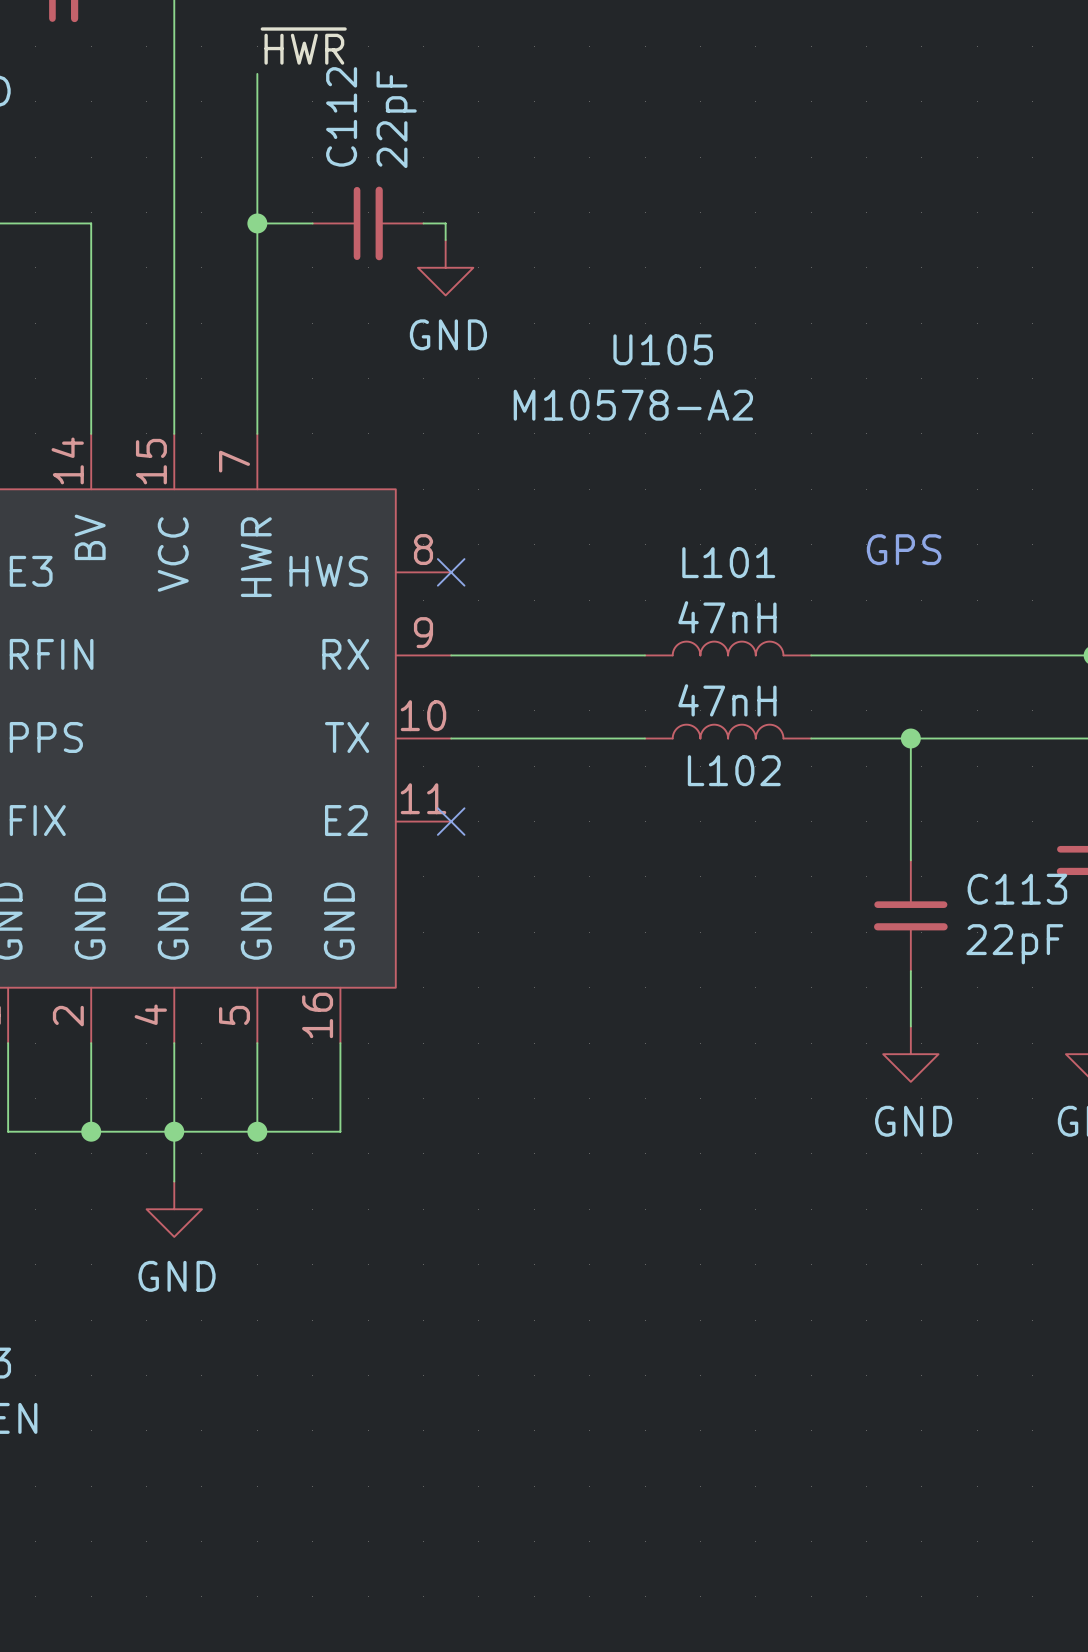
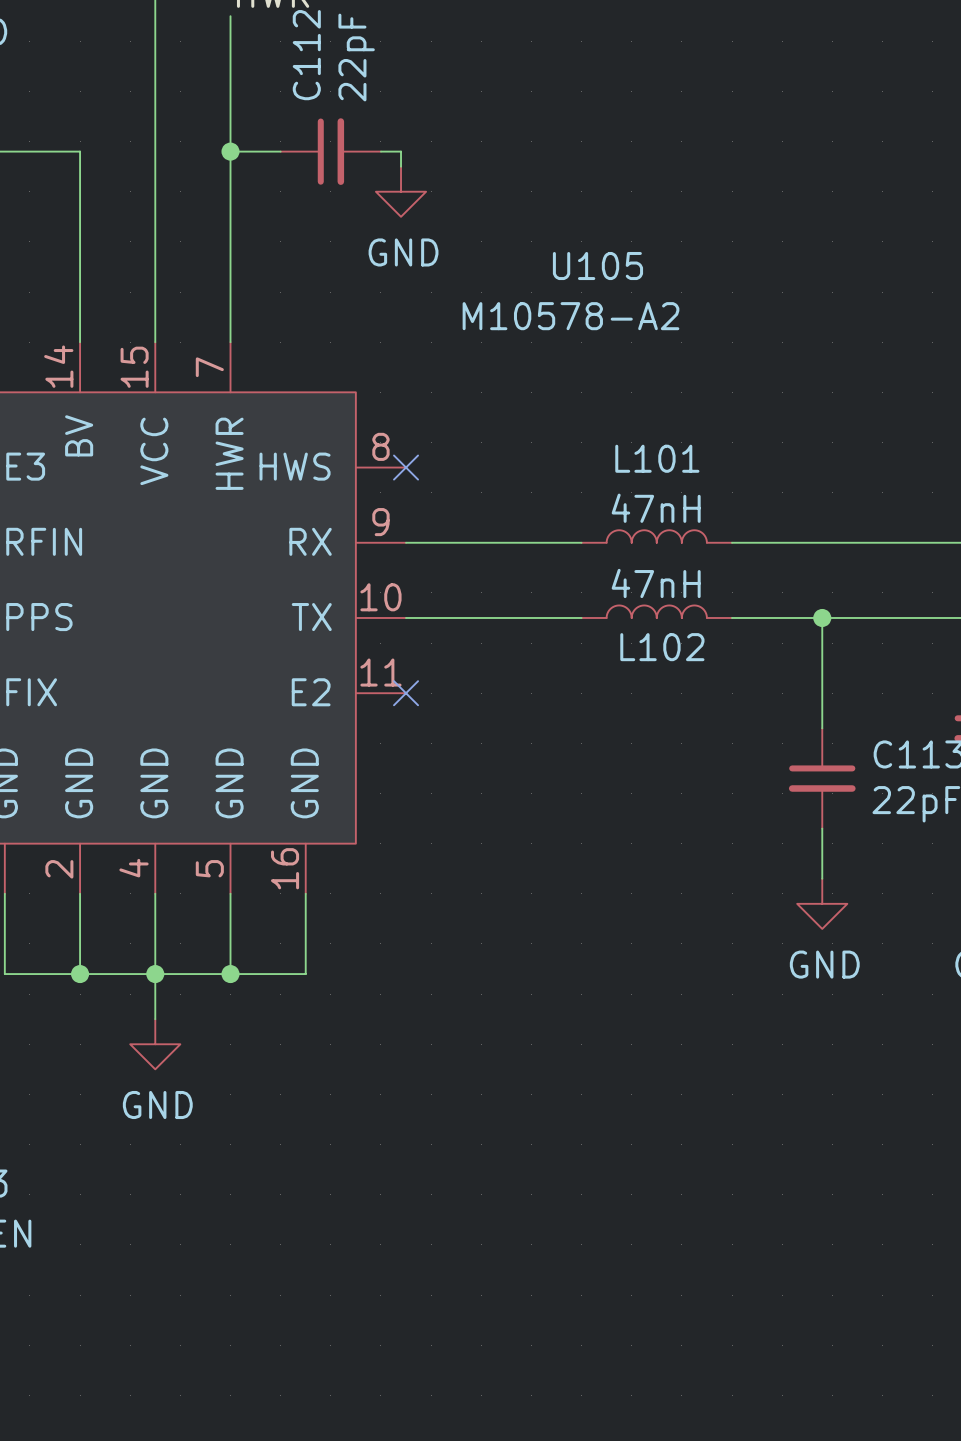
text: GPS (904, 549) -> none

